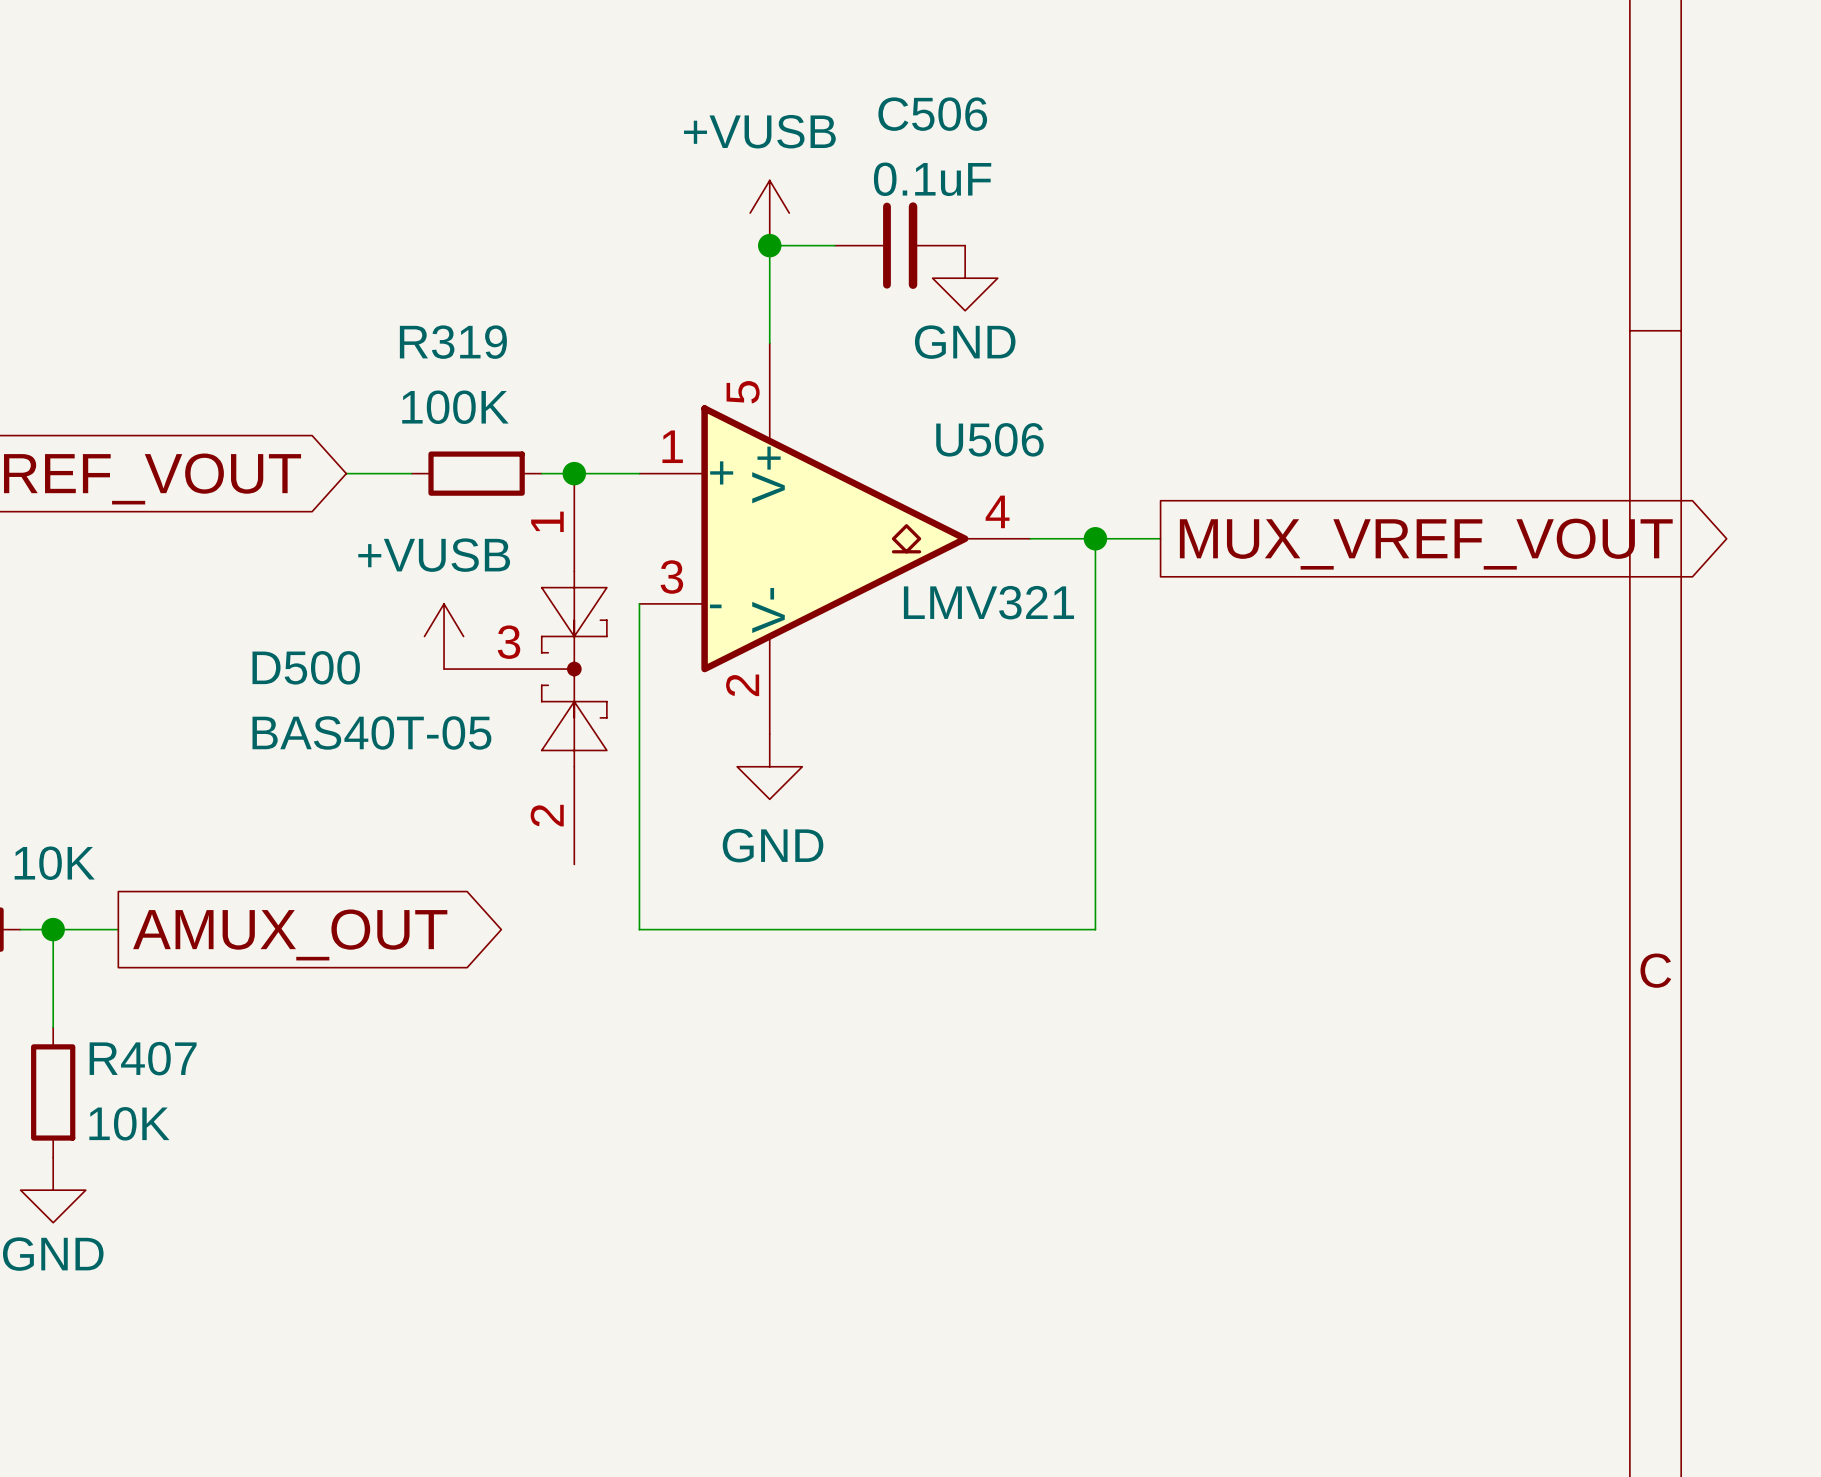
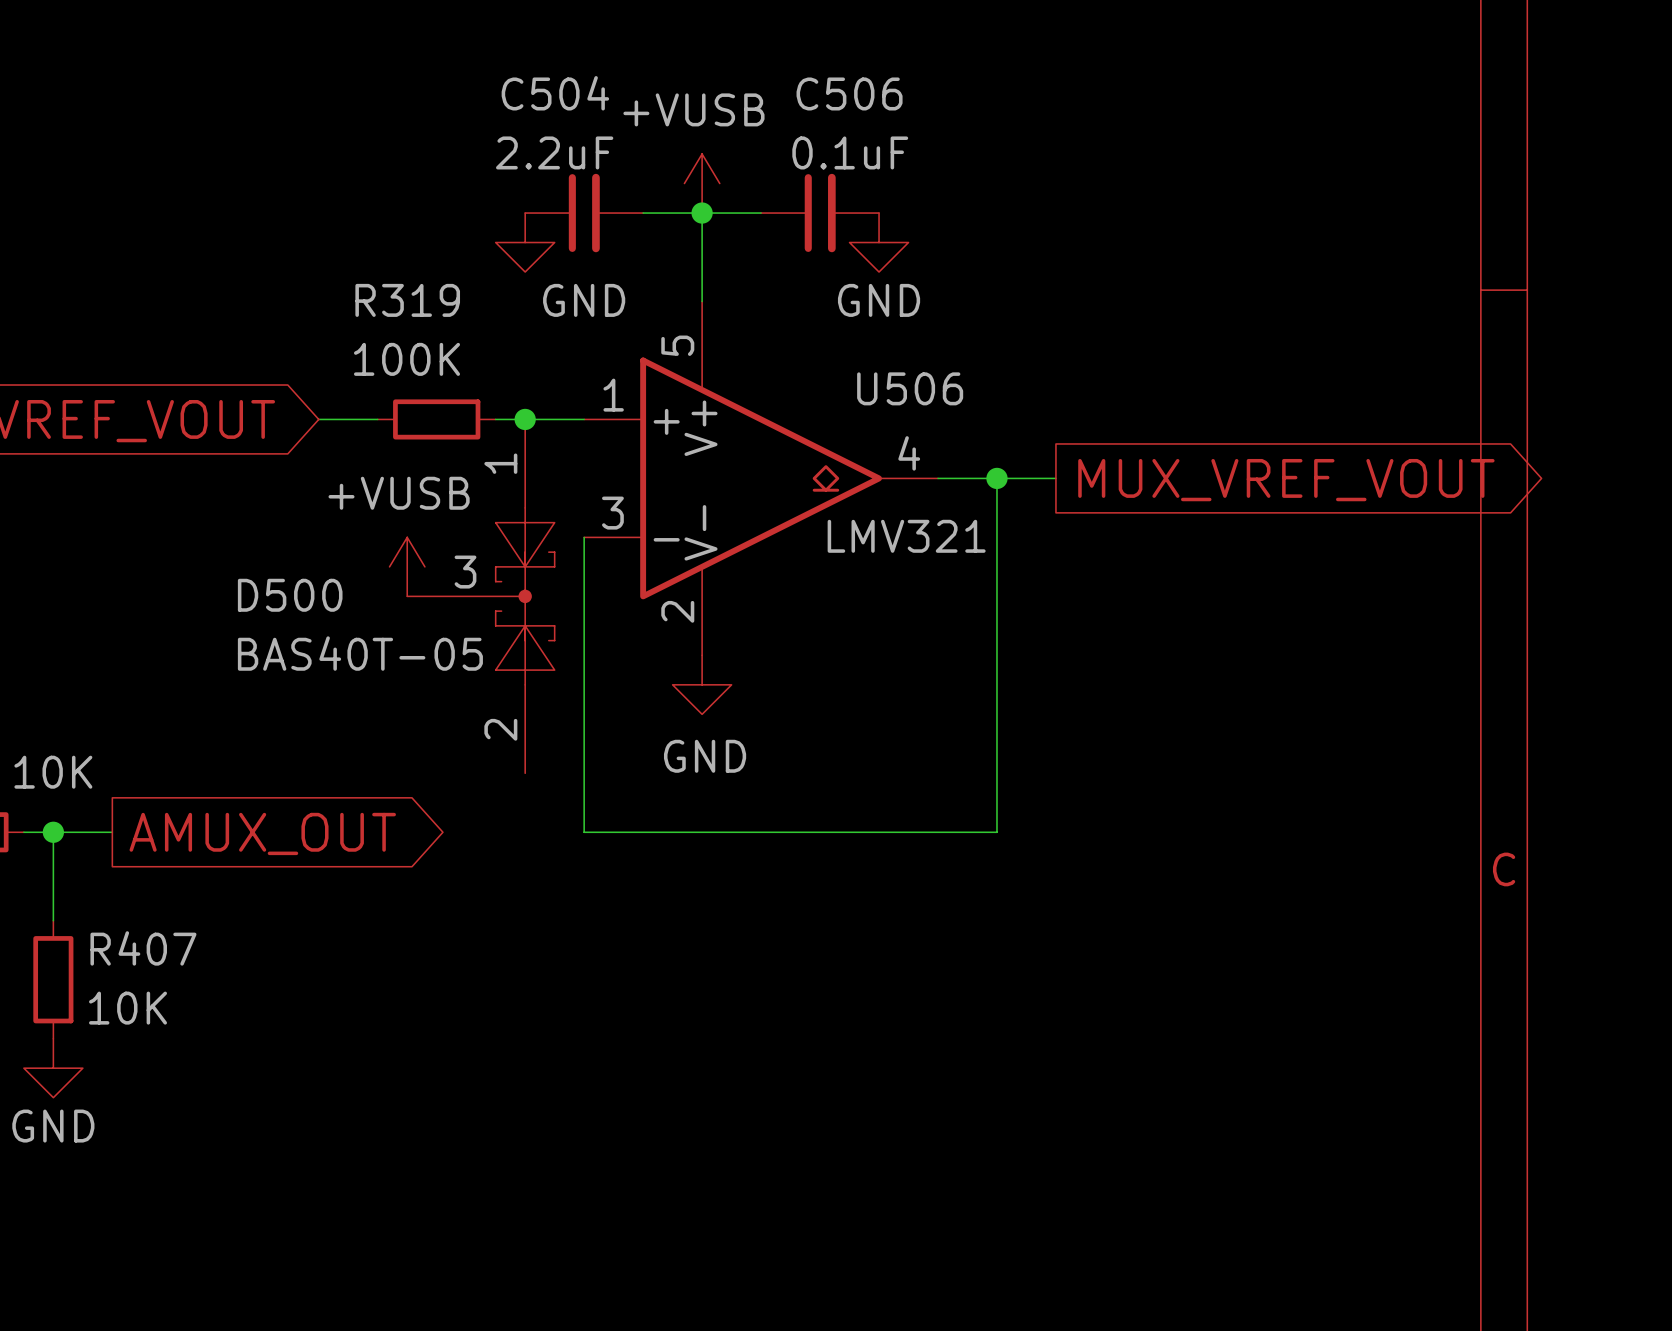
C504: none -> 2.2uF (584, 213)
wire: none -> (643, 213) (702, 213)
power symbol: none -> GND (525, 242)

